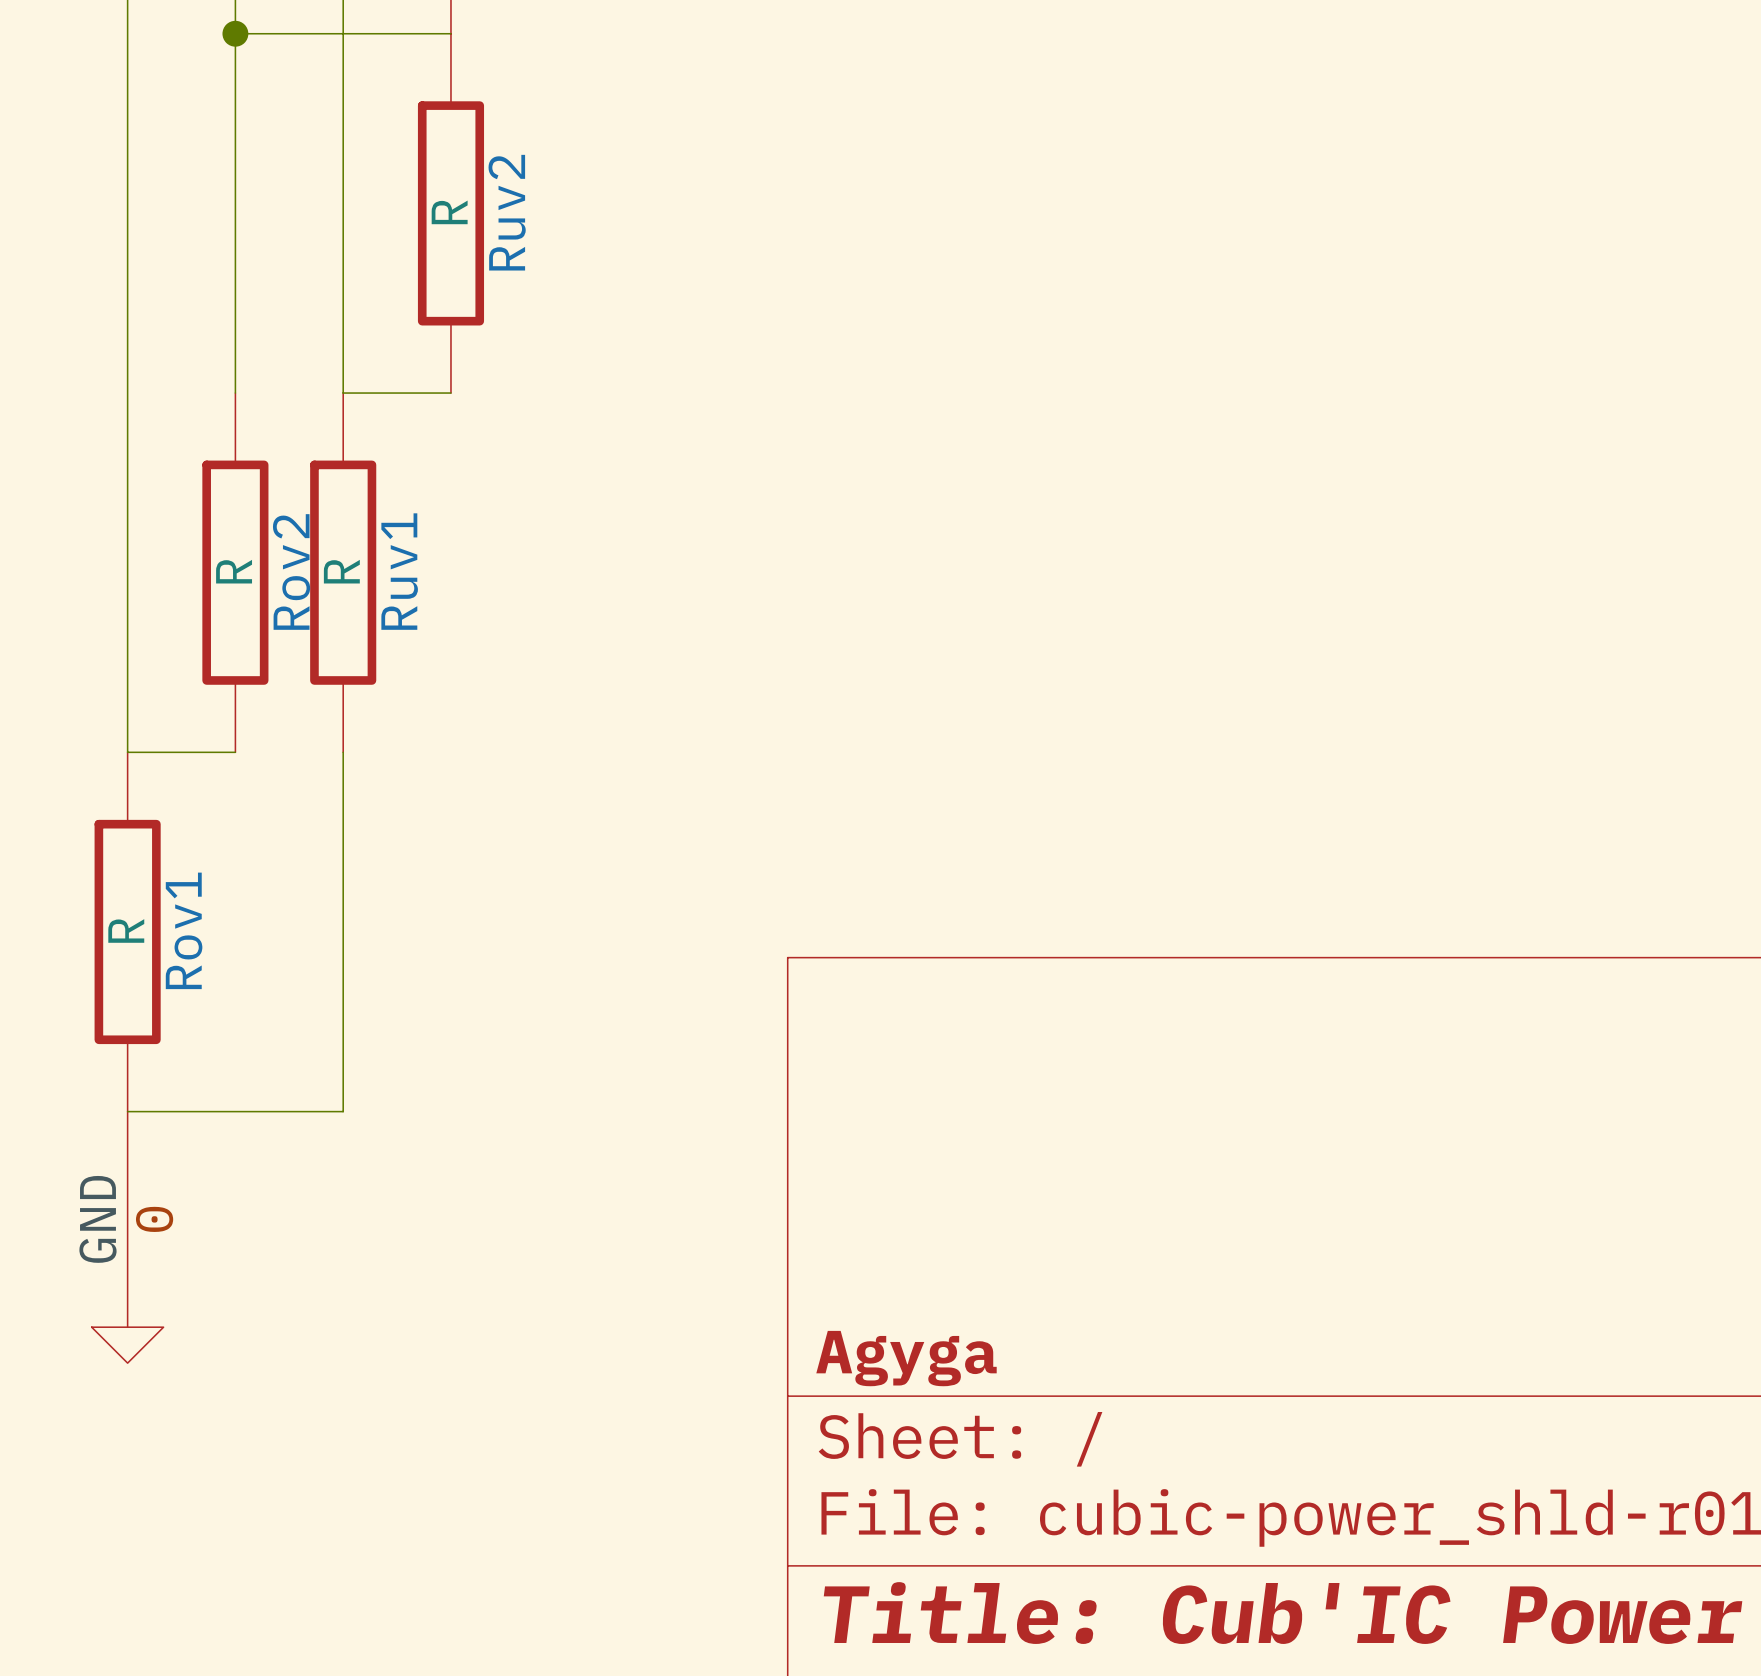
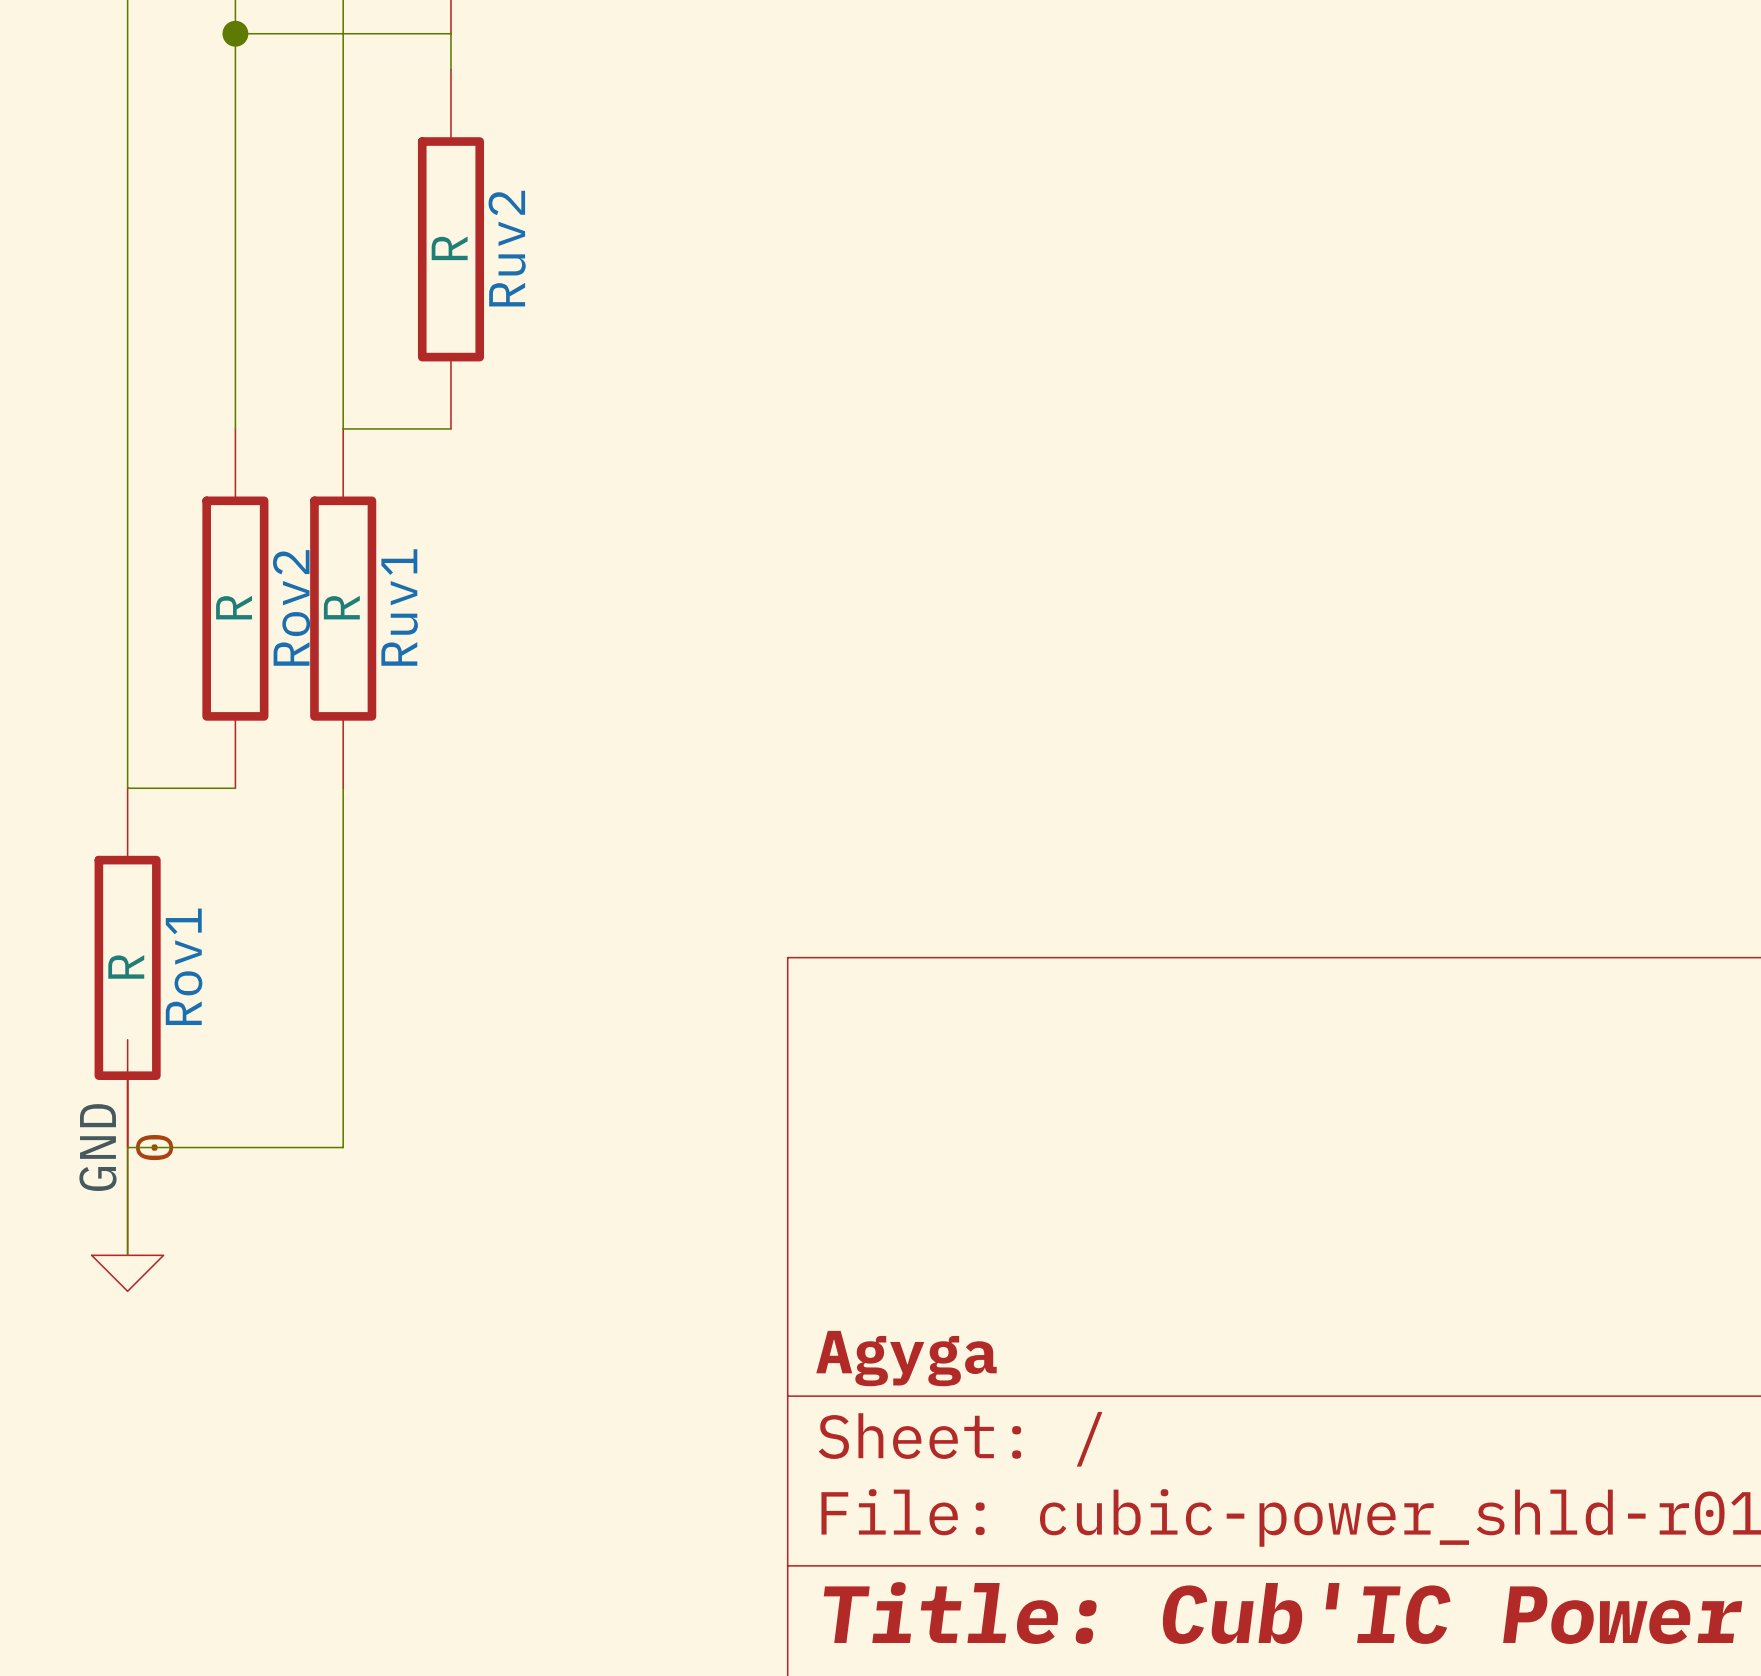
Ruv2 position: (450, 213) -> (450, 249)
wire: (343, 393) (450, 393) -> (343, 393) (343, 428) (450, 428)
Rov2 position: (235, 572) -> (235, 608)
Ruv1 position: (343, 572) -> (343, 608)
wire: (127, 752) (235, 752) -> (127, 752) (127, 788) (235, 788)
Rov1 position: (127, 931) -> (127, 967)
wire: (127, 1111) (343, 1111) -> (127, 1255) (127, 1147) (343, 1147) (343, 1111)
power symbol position: (127, 1237) -> (127, 1165)

